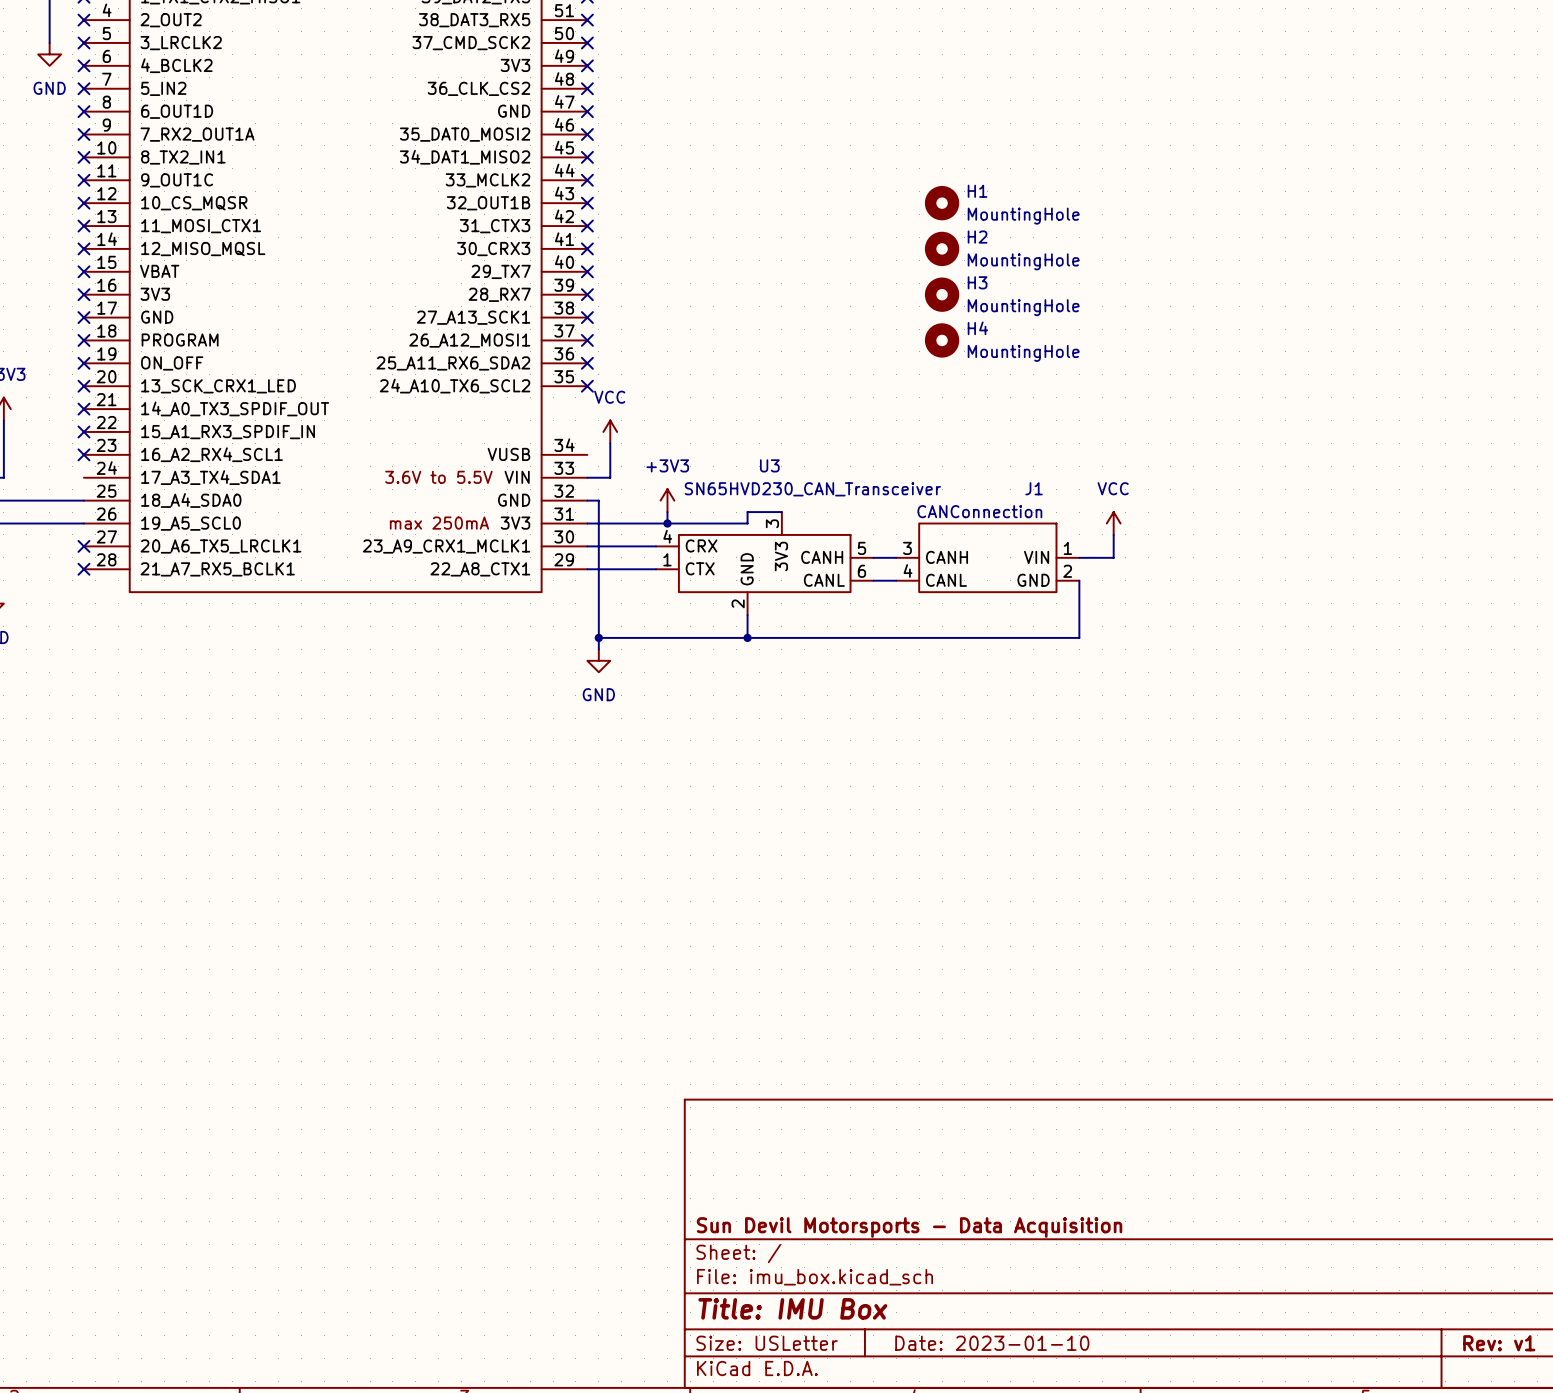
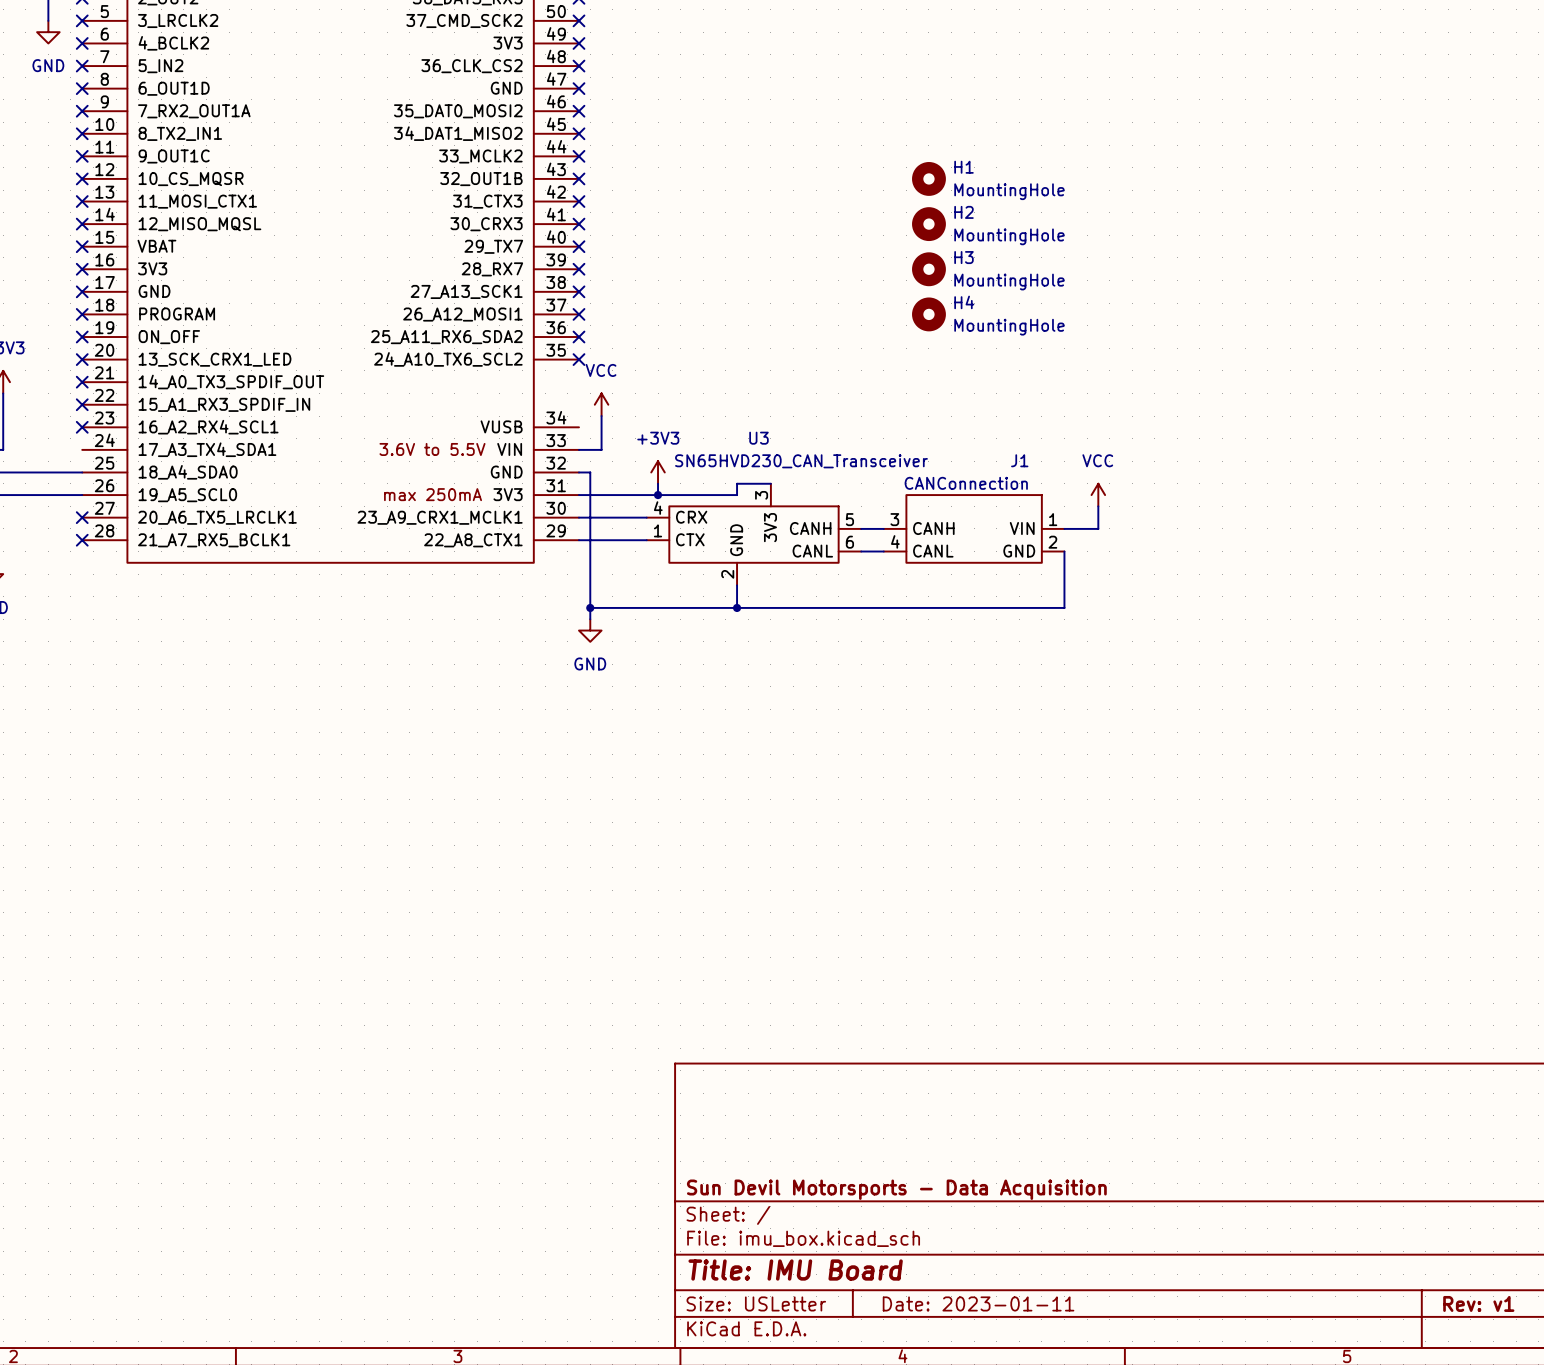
title block: Title: IMU Box (792, 1308) -> Title: IMU Board (795, 1270)
title block: Date: 2023-01-10 (992, 1343) -> Date: 2023-01-11 (978, 1303)

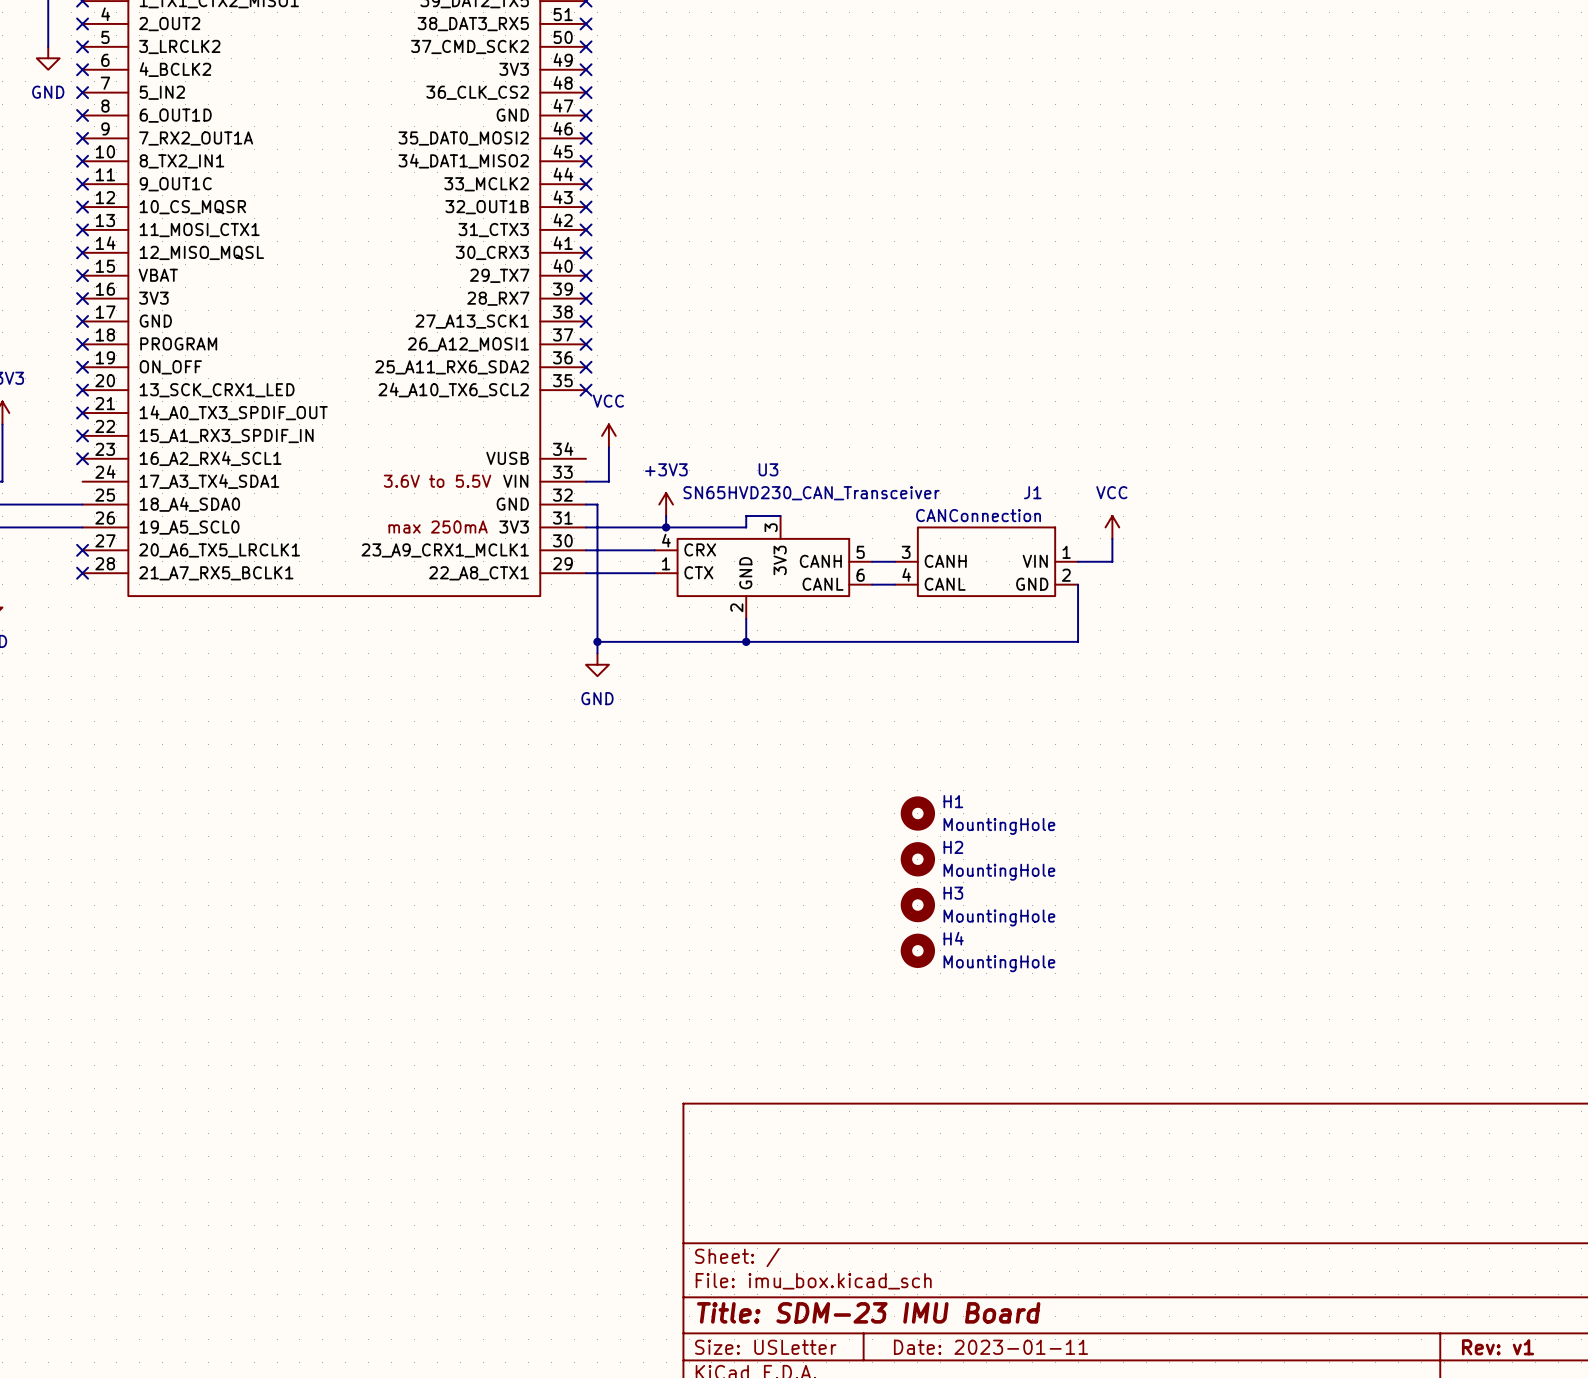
H1 position: (928, 178) -> (917, 813)
H2 position: (928, 224) -> (917, 859)
H3 position: (928, 269) -> (917, 905)
H4 position: (928, 314) -> (917, 950)
title block: Sun Devil Motorsports - Data Acquisition (896, 1189) -> none
title block: Title: IMU Board (795, 1270) -> Title: SDM-23 IMU Board (868, 1312)

